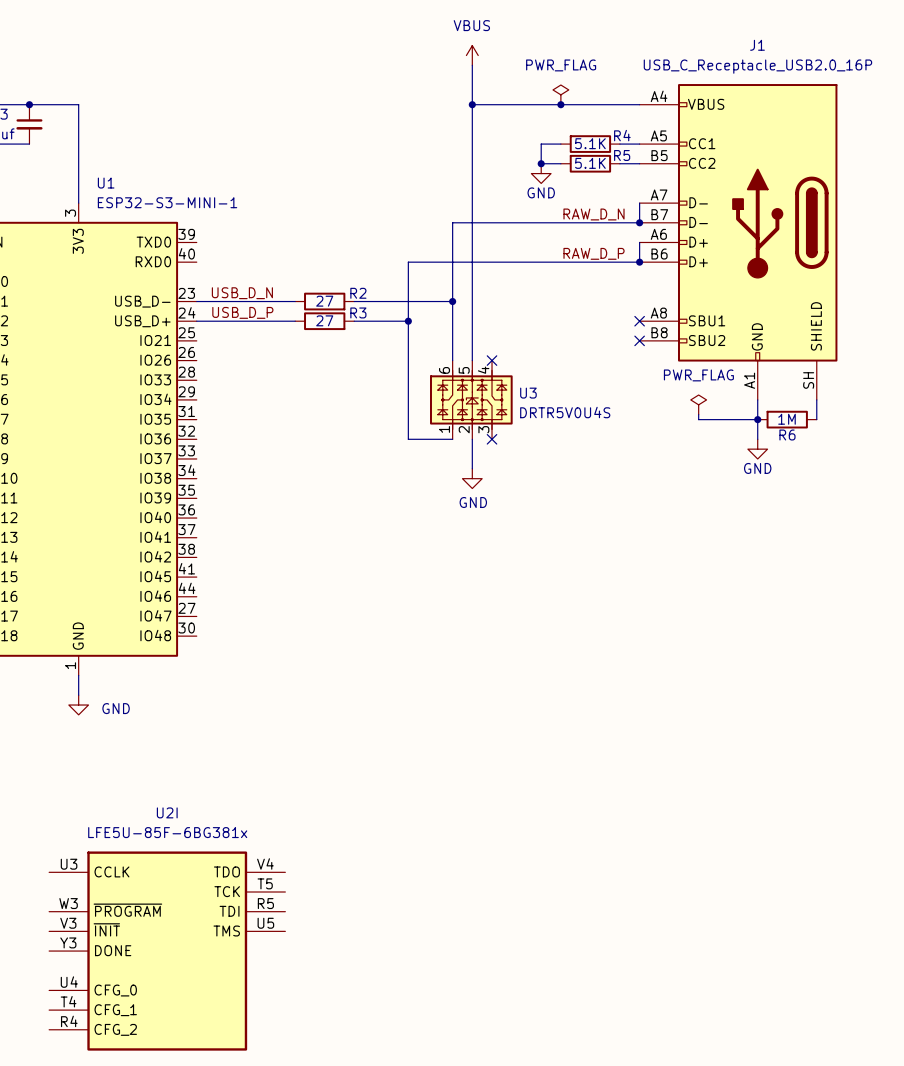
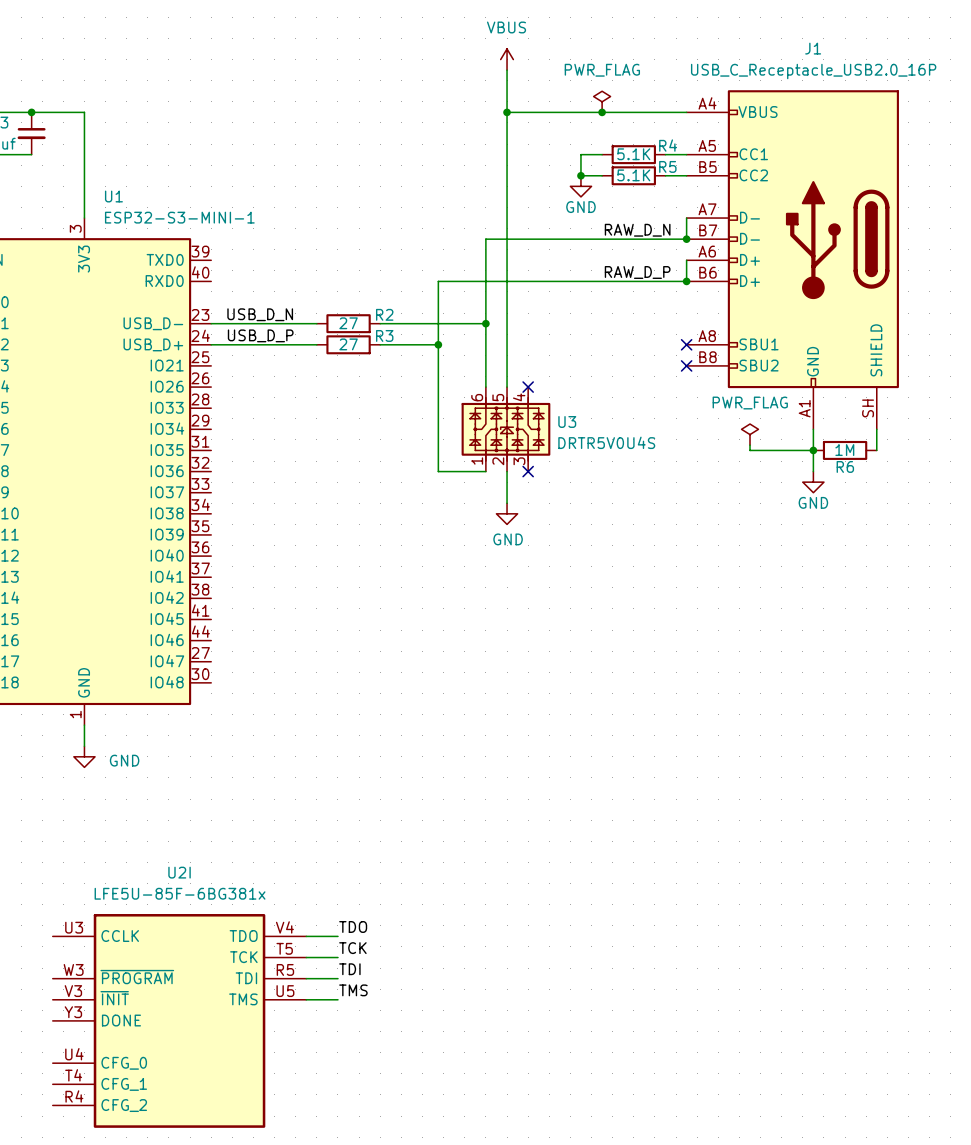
label: none -> TDO (353, 926)
wire: none -> (306, 936) (337, 936)
label: none -> TCK (352, 948)
wire: none -> (306, 957) (337, 957)
label: none -> TDI (349, 969)
wire: none -> (306, 978) (337, 978)
label: none -> TMS (353, 990)
wire: none -> (306, 999) (337, 999)

